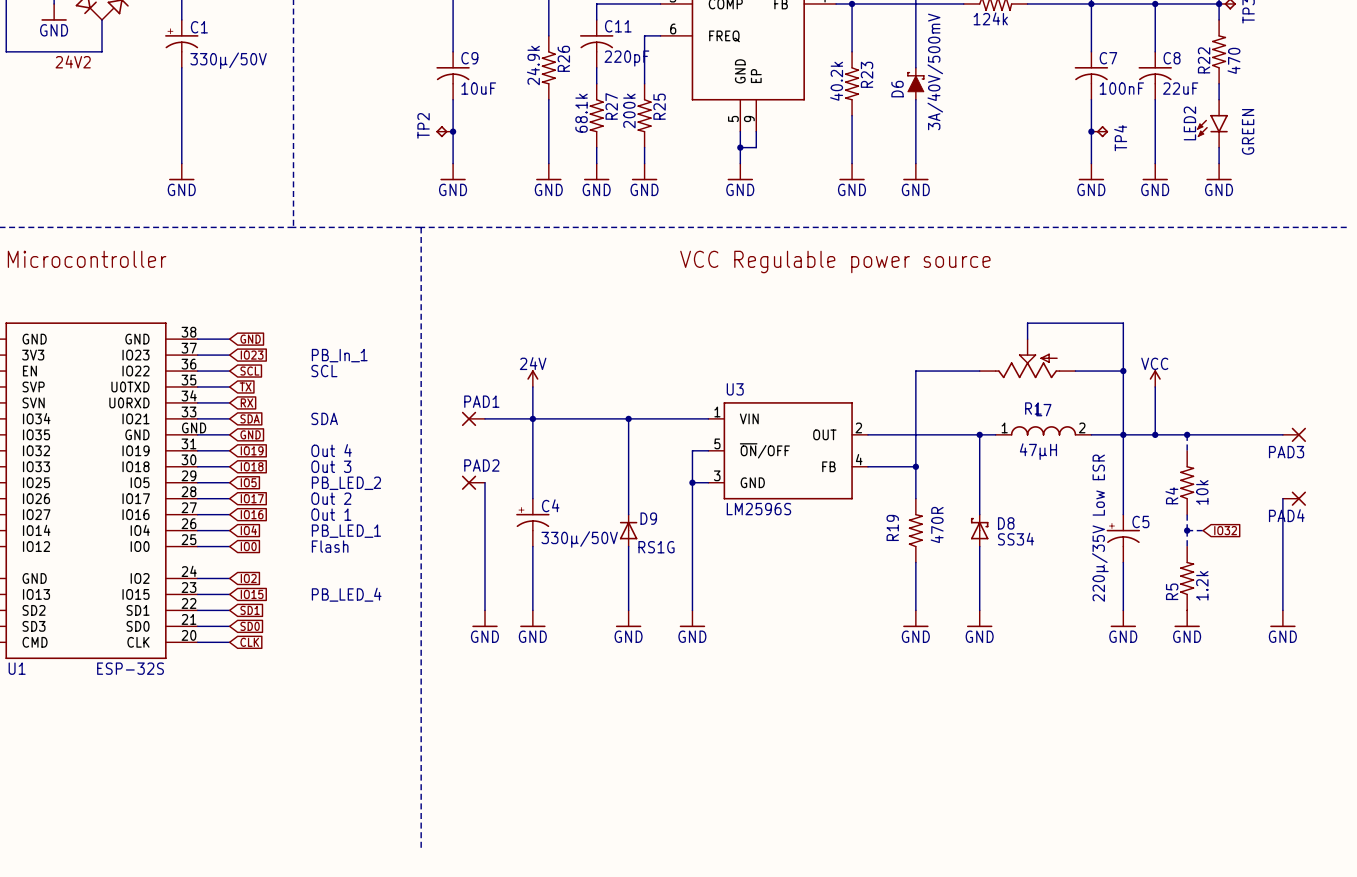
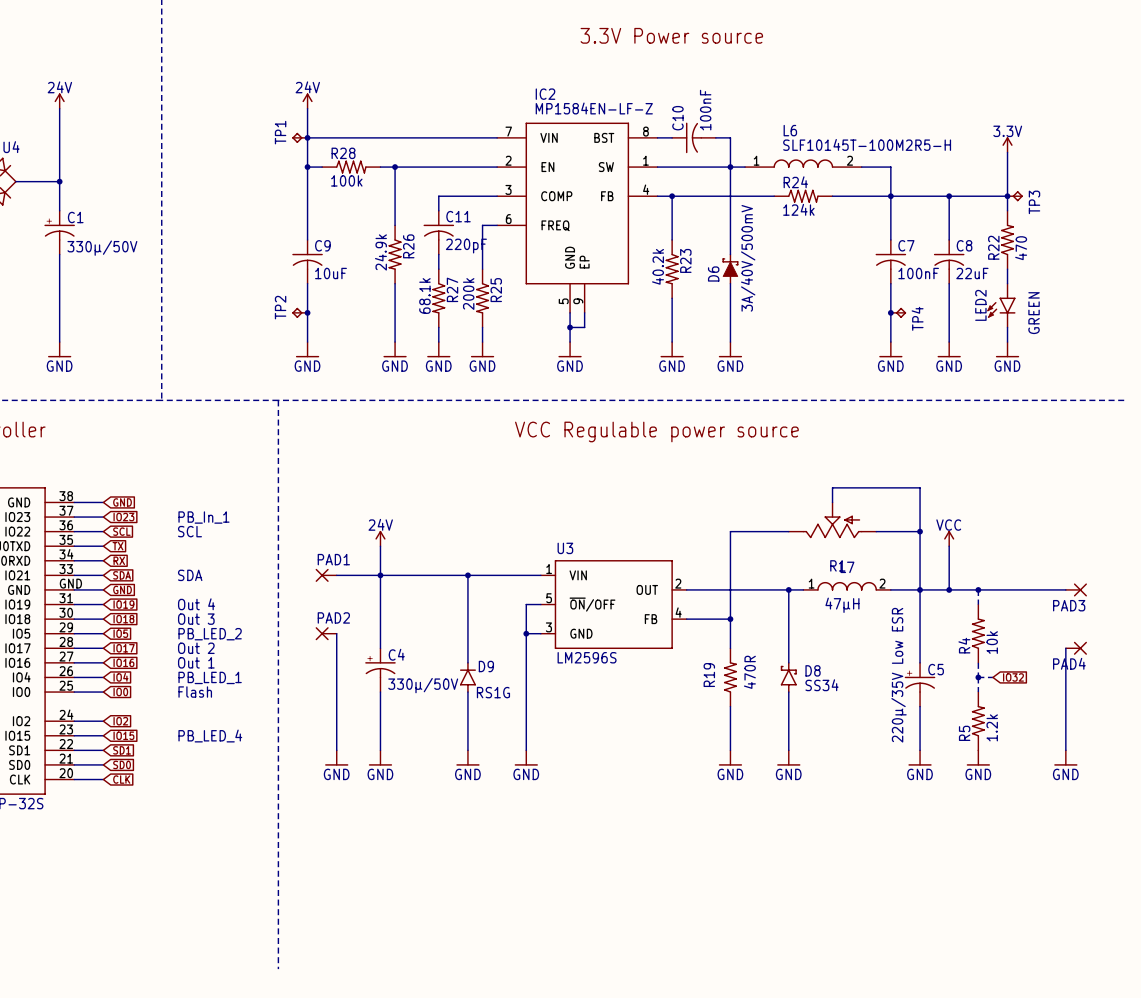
D9 symbol: [619, 514, 638, 547] -> [459, 662, 476, 693]
D8 symbol: [970, 514, 989, 547] -> [780, 662, 797, 693]

